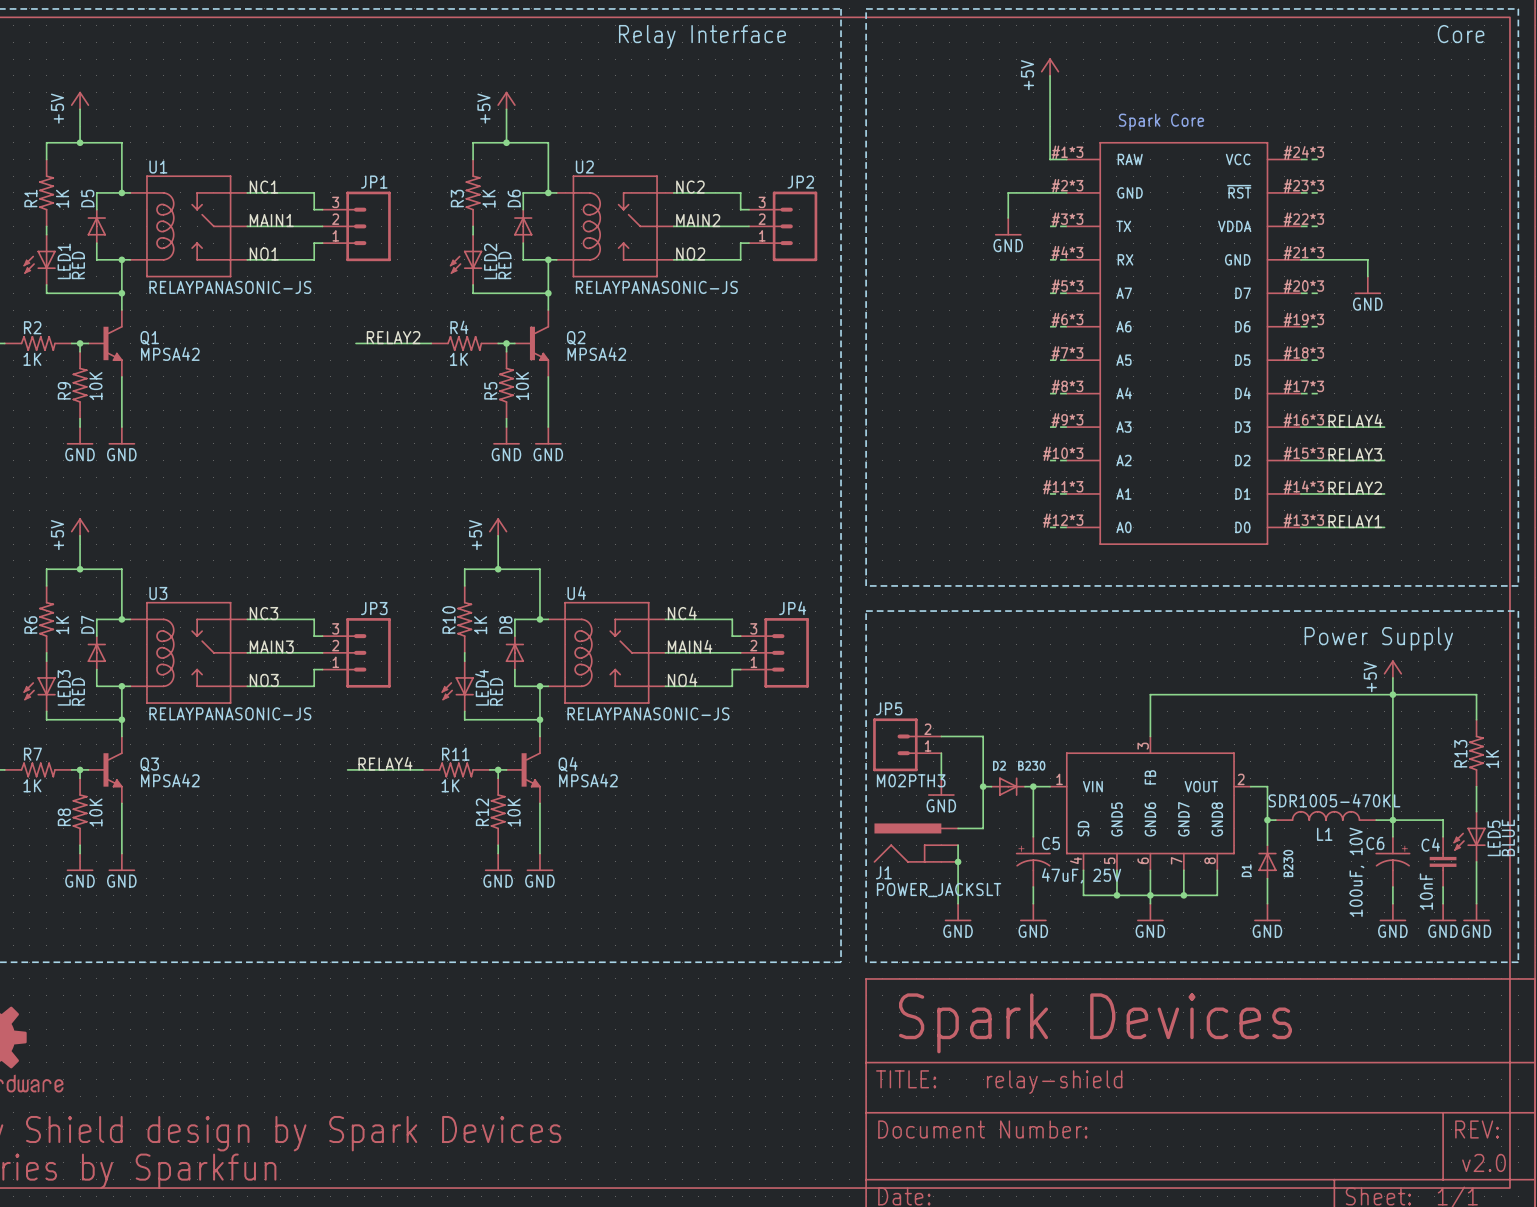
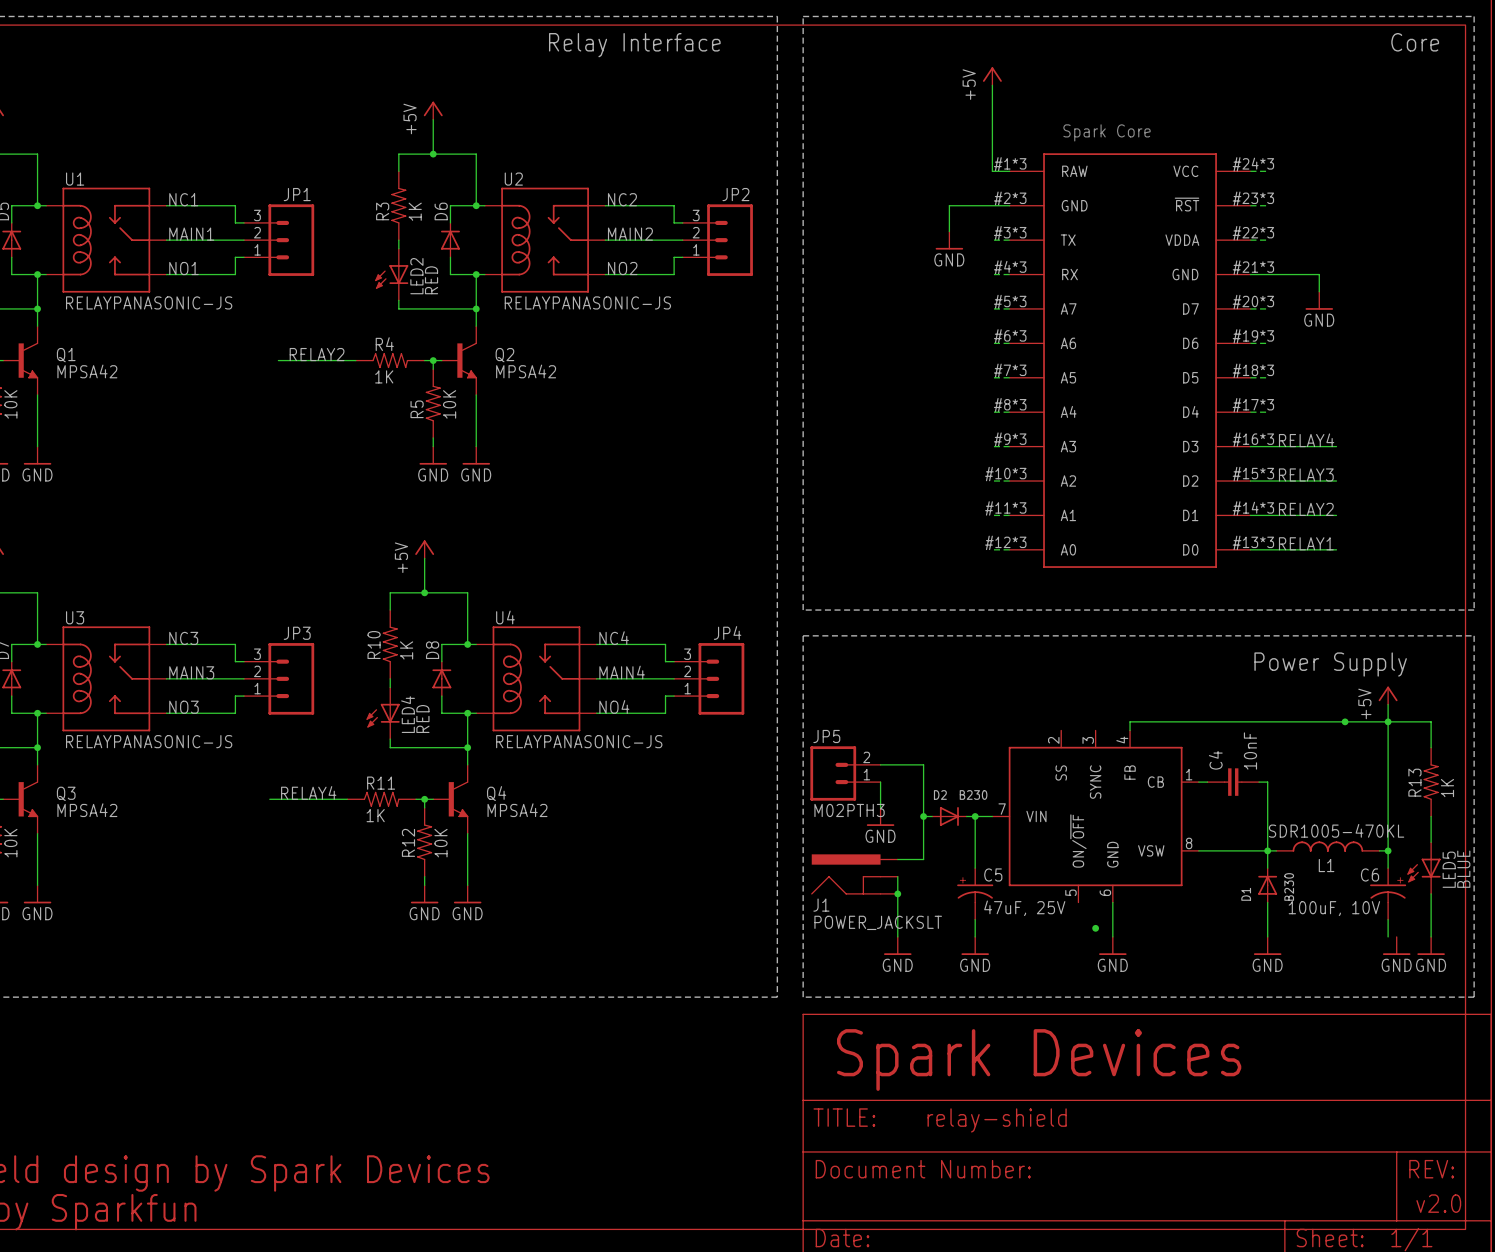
power symbol position: +5V (1392, 669) -> +5V (1388, 695)
wire: (1392, 677) (1392, 836) -> (1388, 704) (1388, 868)
wire: (1183, 694) (1150, 694) (1150, 736) -> (1130, 721) (1130, 730)
junction: none -> (1388, 721)
wire: none -> (1198, 782) (1207, 782)
wire: none -> (1259, 782) (1267, 782) (1267, 868)
part: none -> (1095, 816)
wire: (1250, 786) (1267, 786) (1267, 845) -> none
part: (1150, 803) -> none
L1 position: (1326, 815) -> (1327, 846)
wire: none -> (1198, 850) (1216, 850)
junction: (1267, 820) -> none
junction: none -> (1267, 850)
wire: (1376, 820) (1426, 820) -> (1224, 850) (1276, 850)
junction: (1392, 820) -> none
wire: (1434, 820) (1443, 820) (1443, 836) -> none
junction: none -> (1388, 850)
D1 position: (1267, 861) -> (1267, 885)
C6 position: (1392, 861) -> (1388, 893)
C4 rotation: 0° (1443, 861) -> 90° clockwise (1233, 782)
C4 position: (1443, 861) -> (1233, 782)
wire: (1083, 870) (1083, 895) (1217, 895) (1217, 870) -> none
wire: (1116, 870) (1116, 895) -> none
wire: (1150, 870) (1150, 903) -> (1112, 902) (1112, 936)
wire: (1183, 870) (1183, 895) -> none
wire: none -> (1267, 902) (1267, 936)
C6 value rotation: 0° (1356, 872) -> 90° clockwise (1334, 908)
wire: (1267, 878) (1267, 903) -> none
wire: (1392, 886) (1392, 903) -> (1388, 919) (1388, 936)
wire: (1443, 886) (1443, 903) -> none
C4 value position: 10nF (1426, 891) -> 10nF (1250, 751)
junction: (1116, 895) -> none
junction: (1183, 895) -> none
power symbol position: GND (1150, 912) -> GND (1112, 945)
power symbol: GND (1267, 912) -> none
power symbol: none -> GND (1267, 945)
power symbol: GND (1392, 912) -> none

